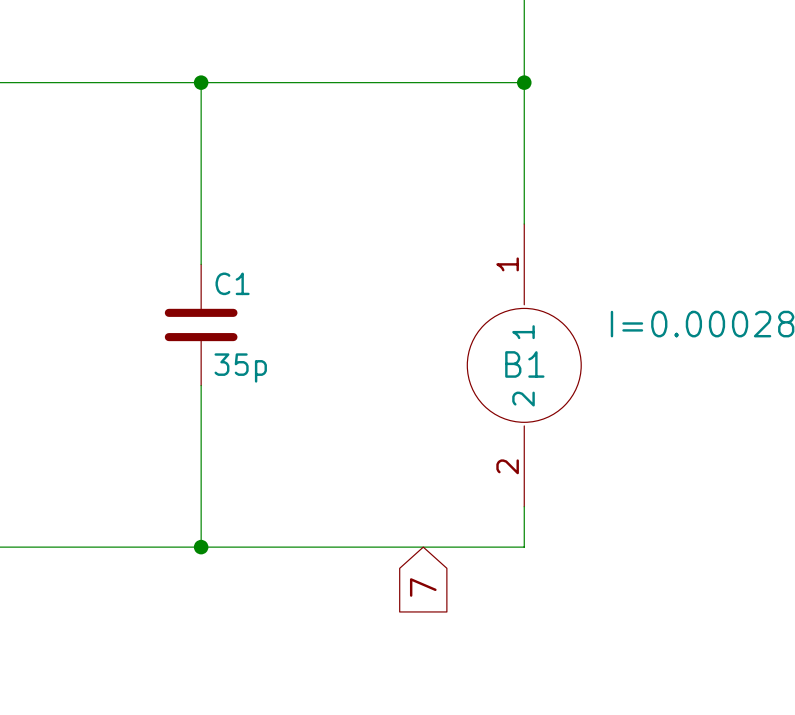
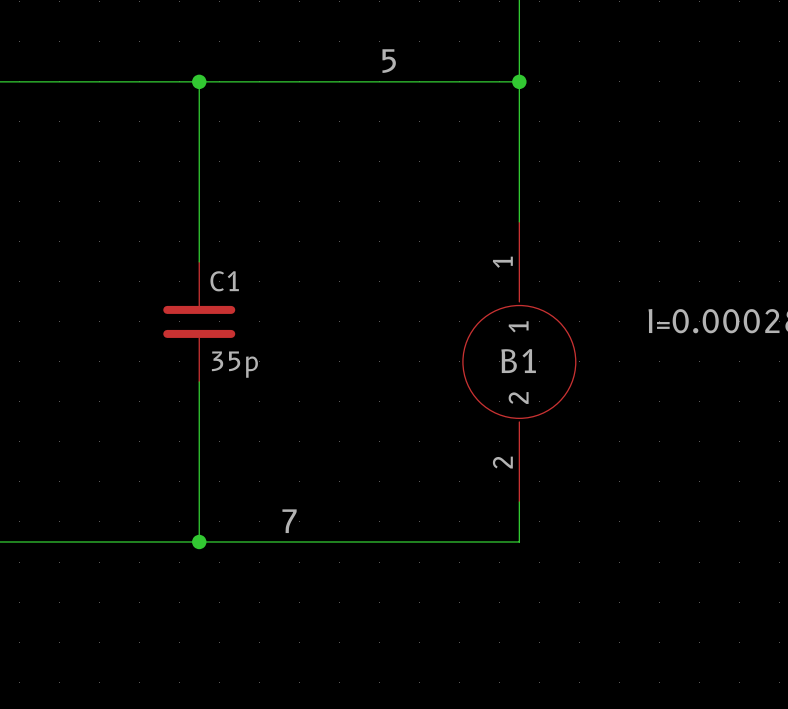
label: none -> 5 (389, 61)
label: none -> 7 (289, 521)
global label: 7 (423, 587) -> none

